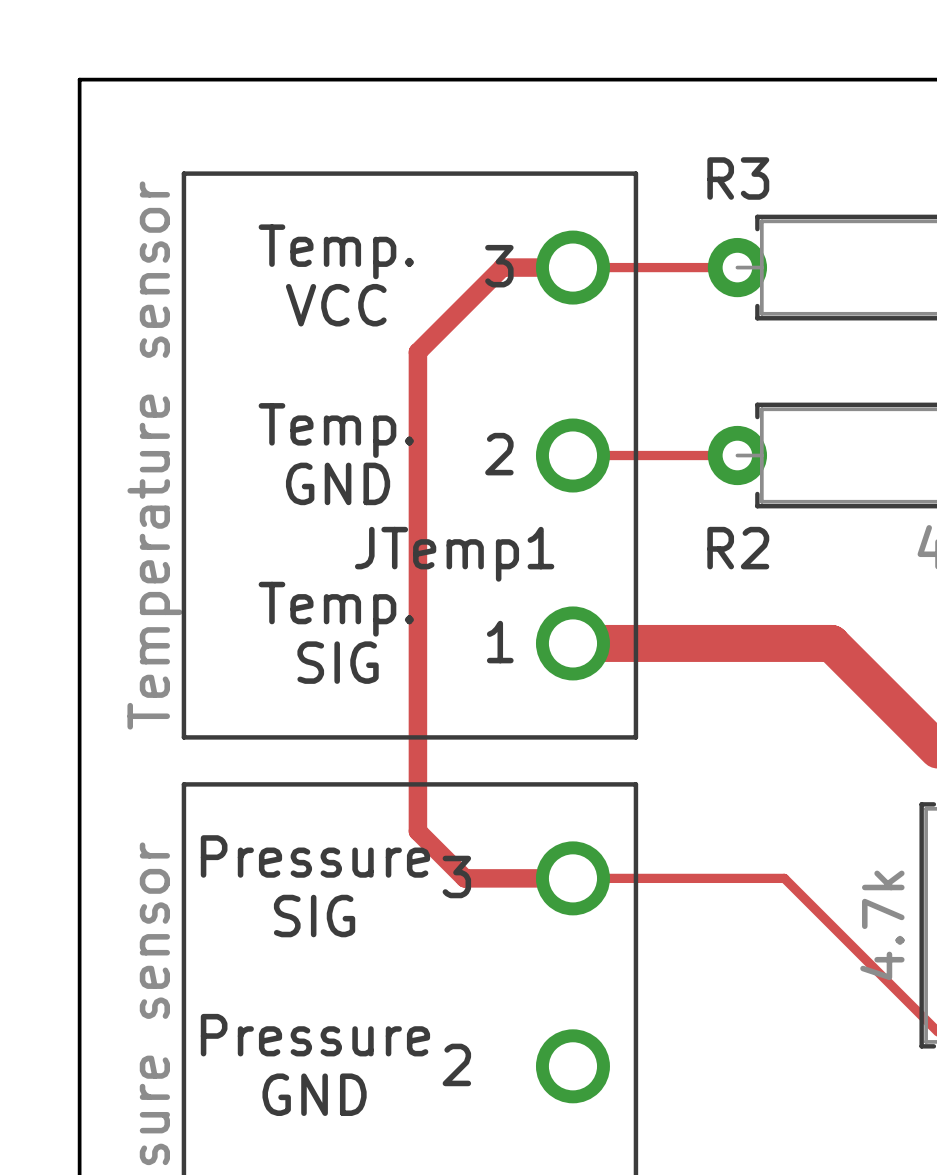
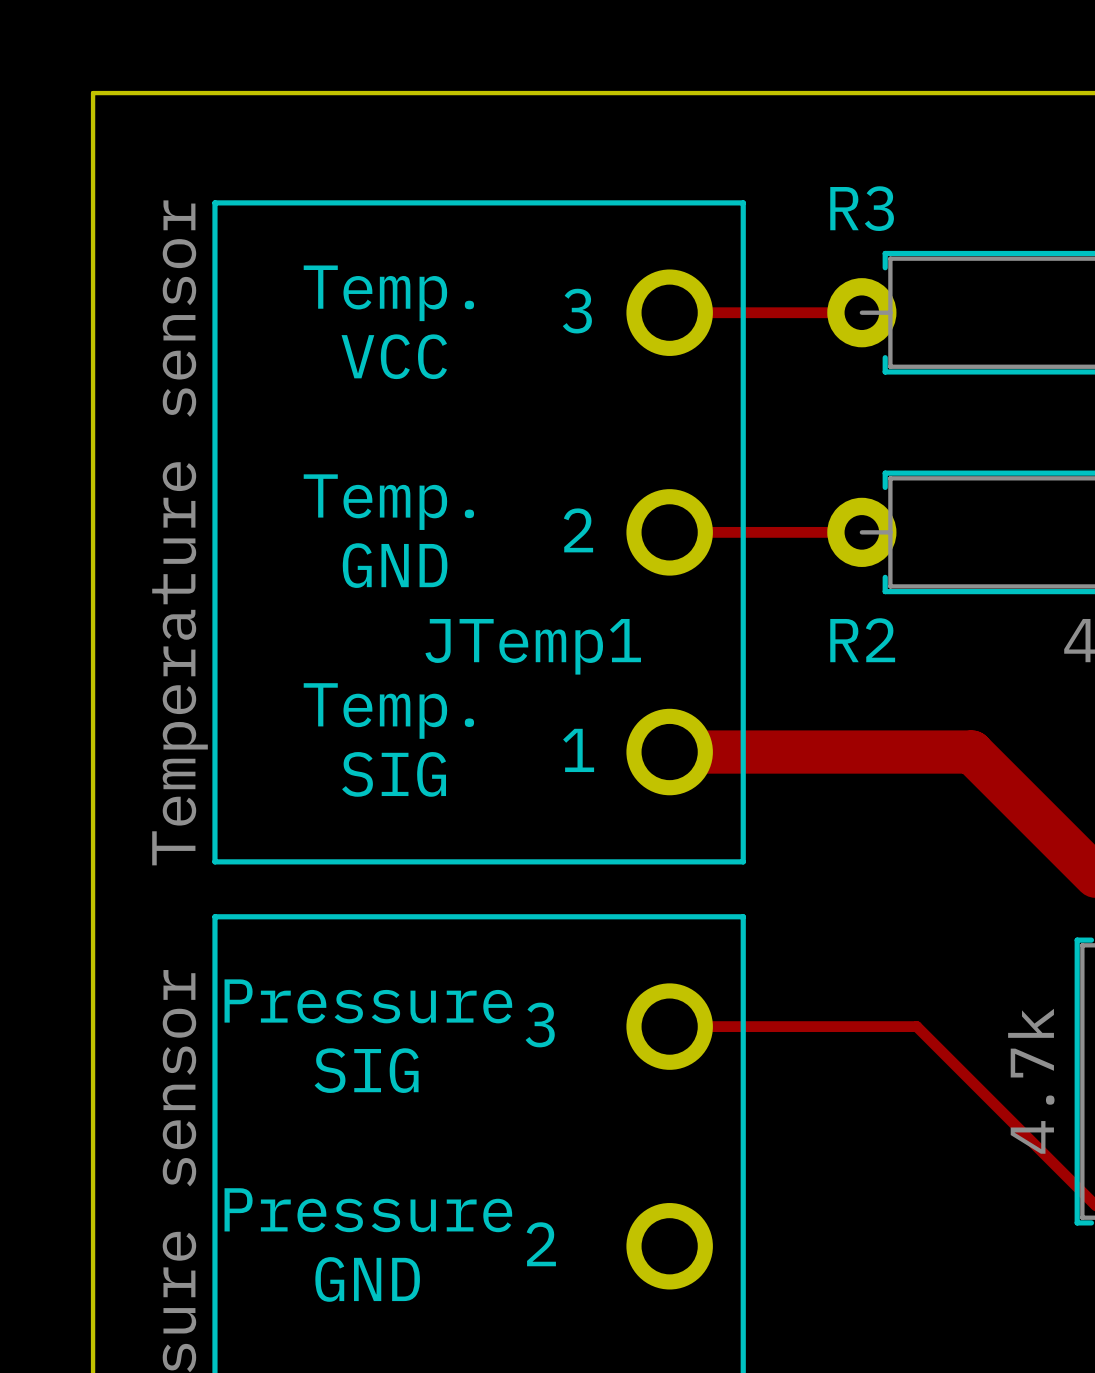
track: (572, 267) (502, 267) (417, 352) (417, 831) (464, 878) (572, 878) -> none

